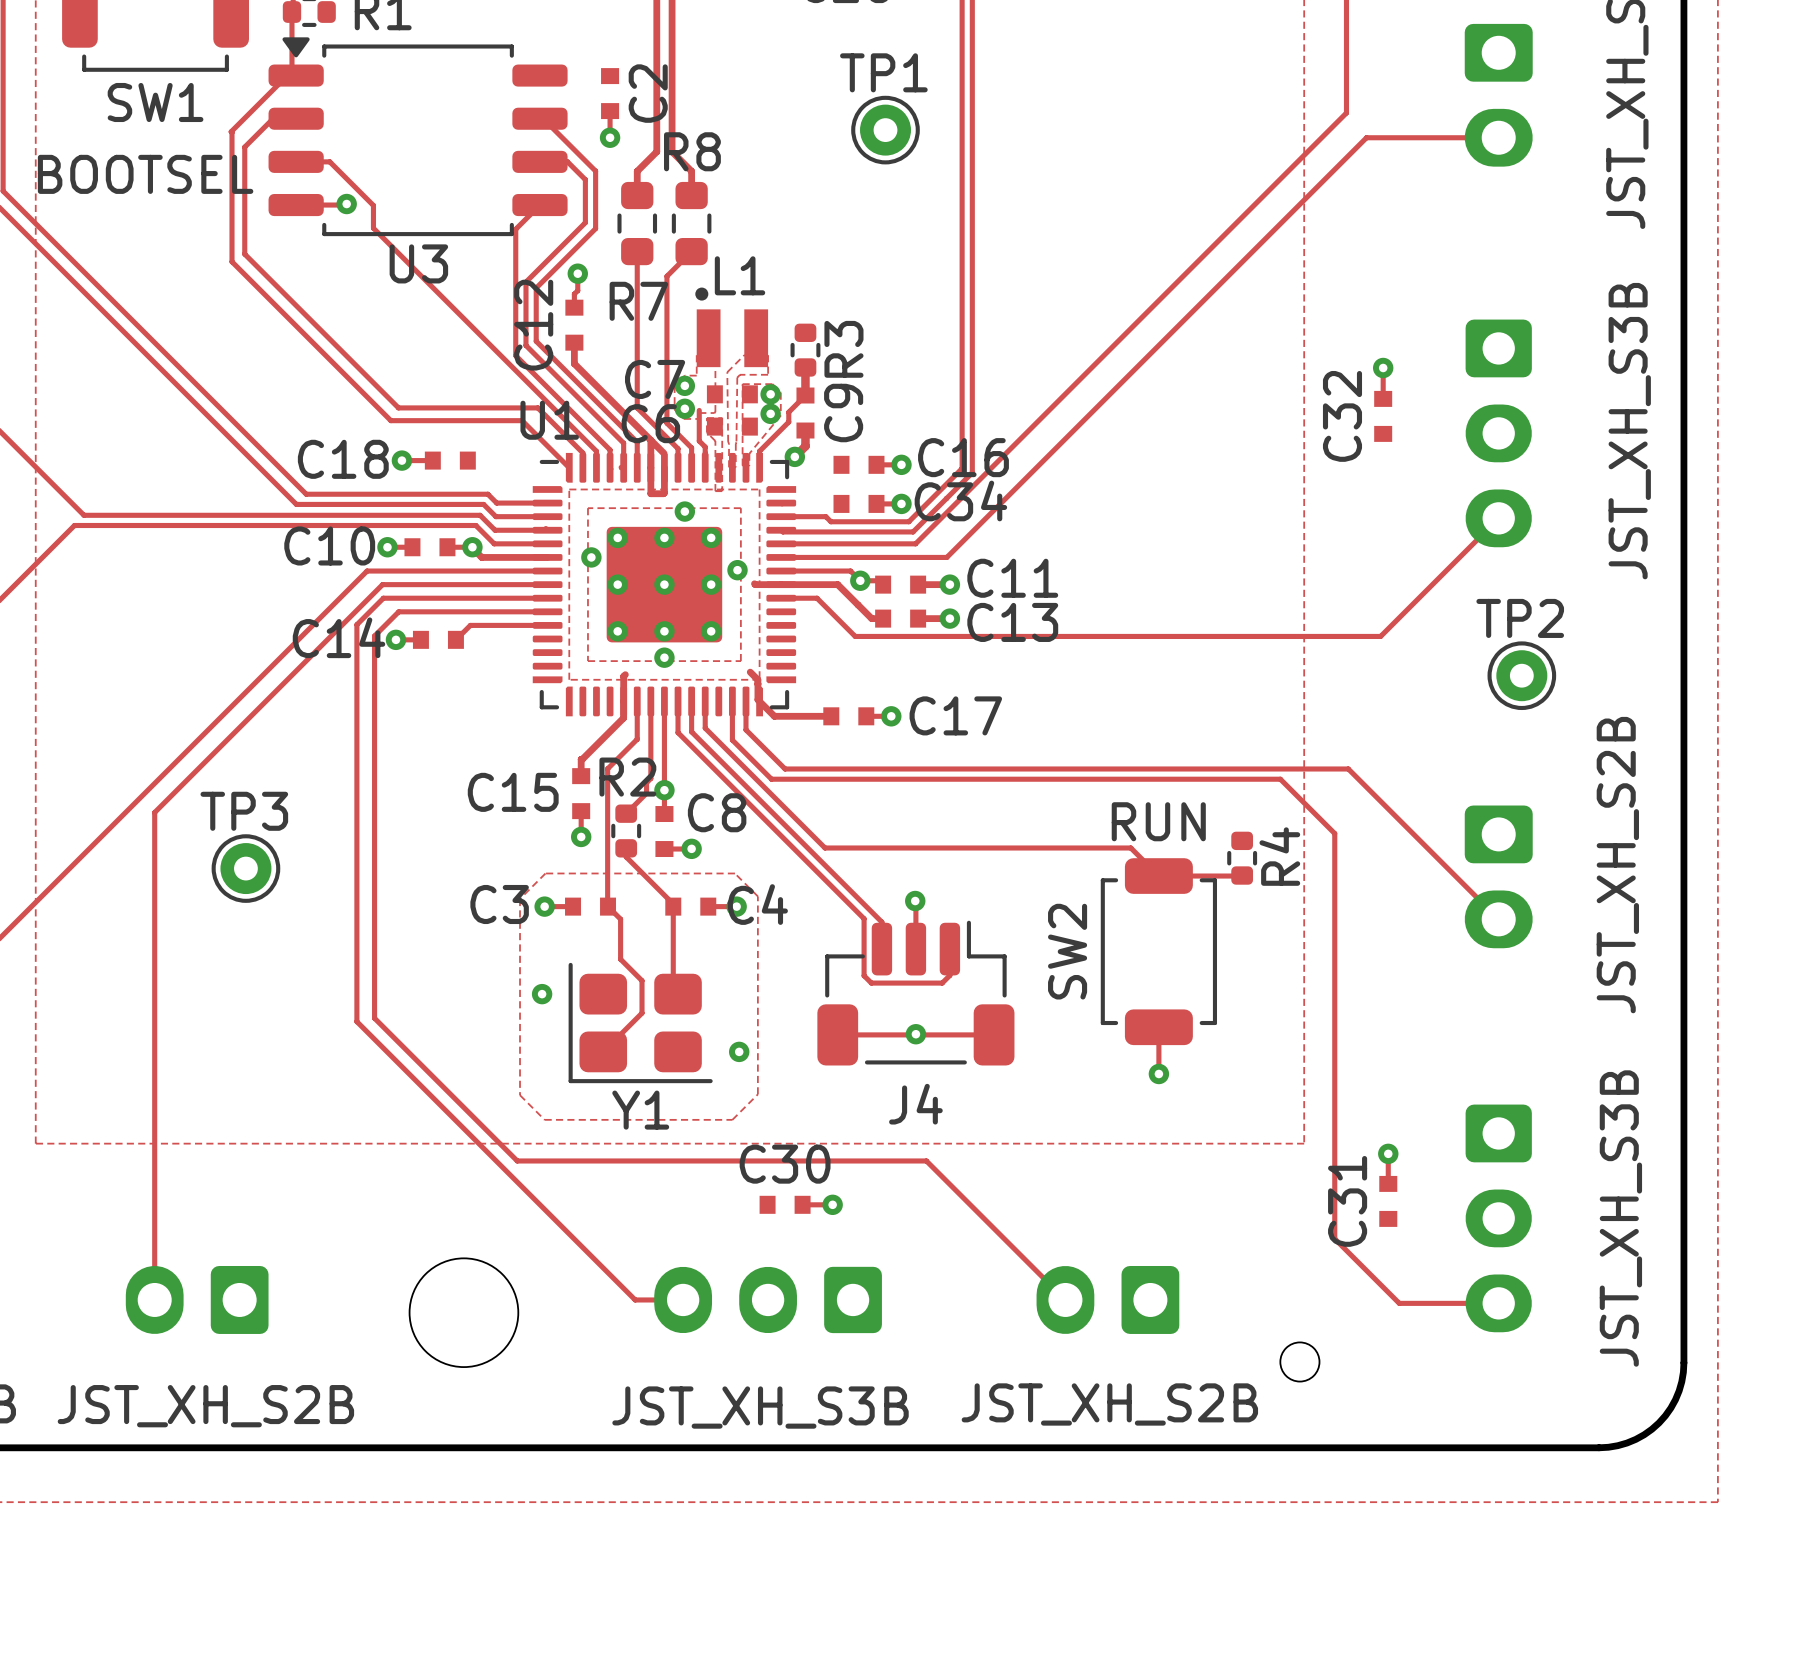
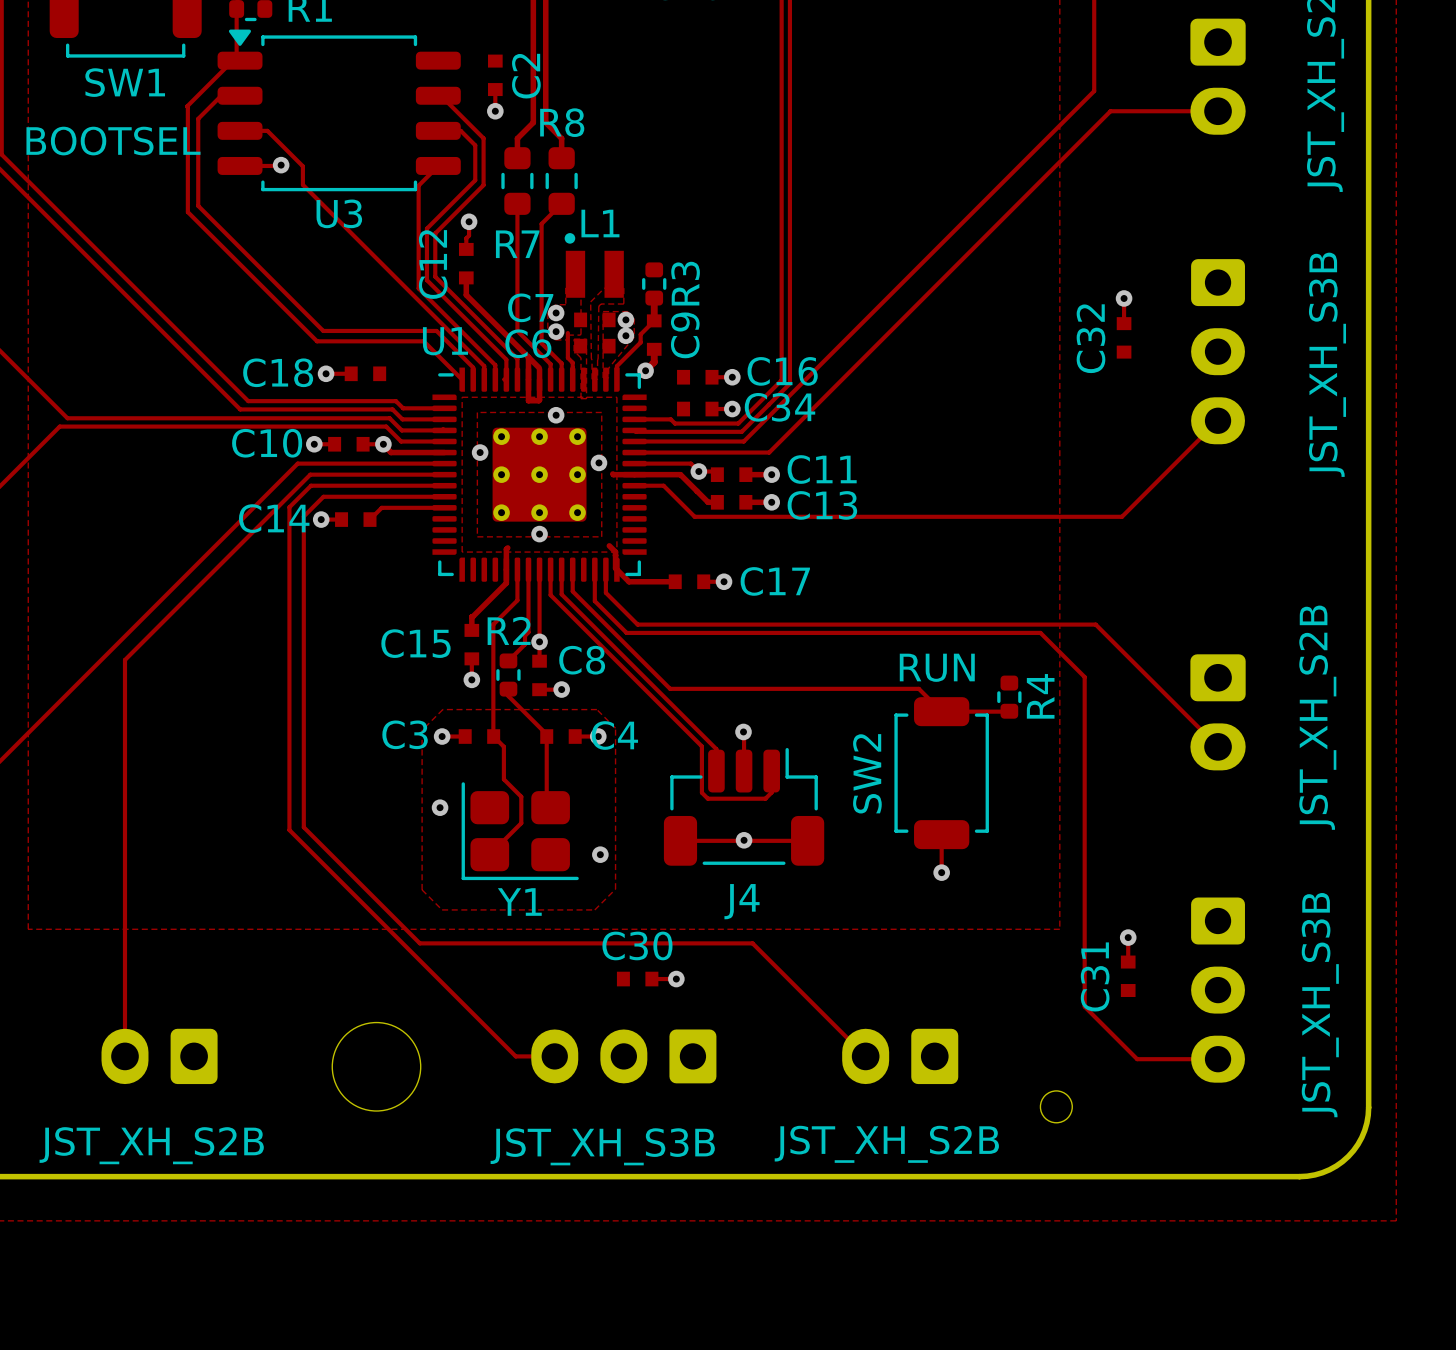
TP1: (885, 130) -> none
TP2: (1521, 675) -> none
TP3: (245, 868) -> none

